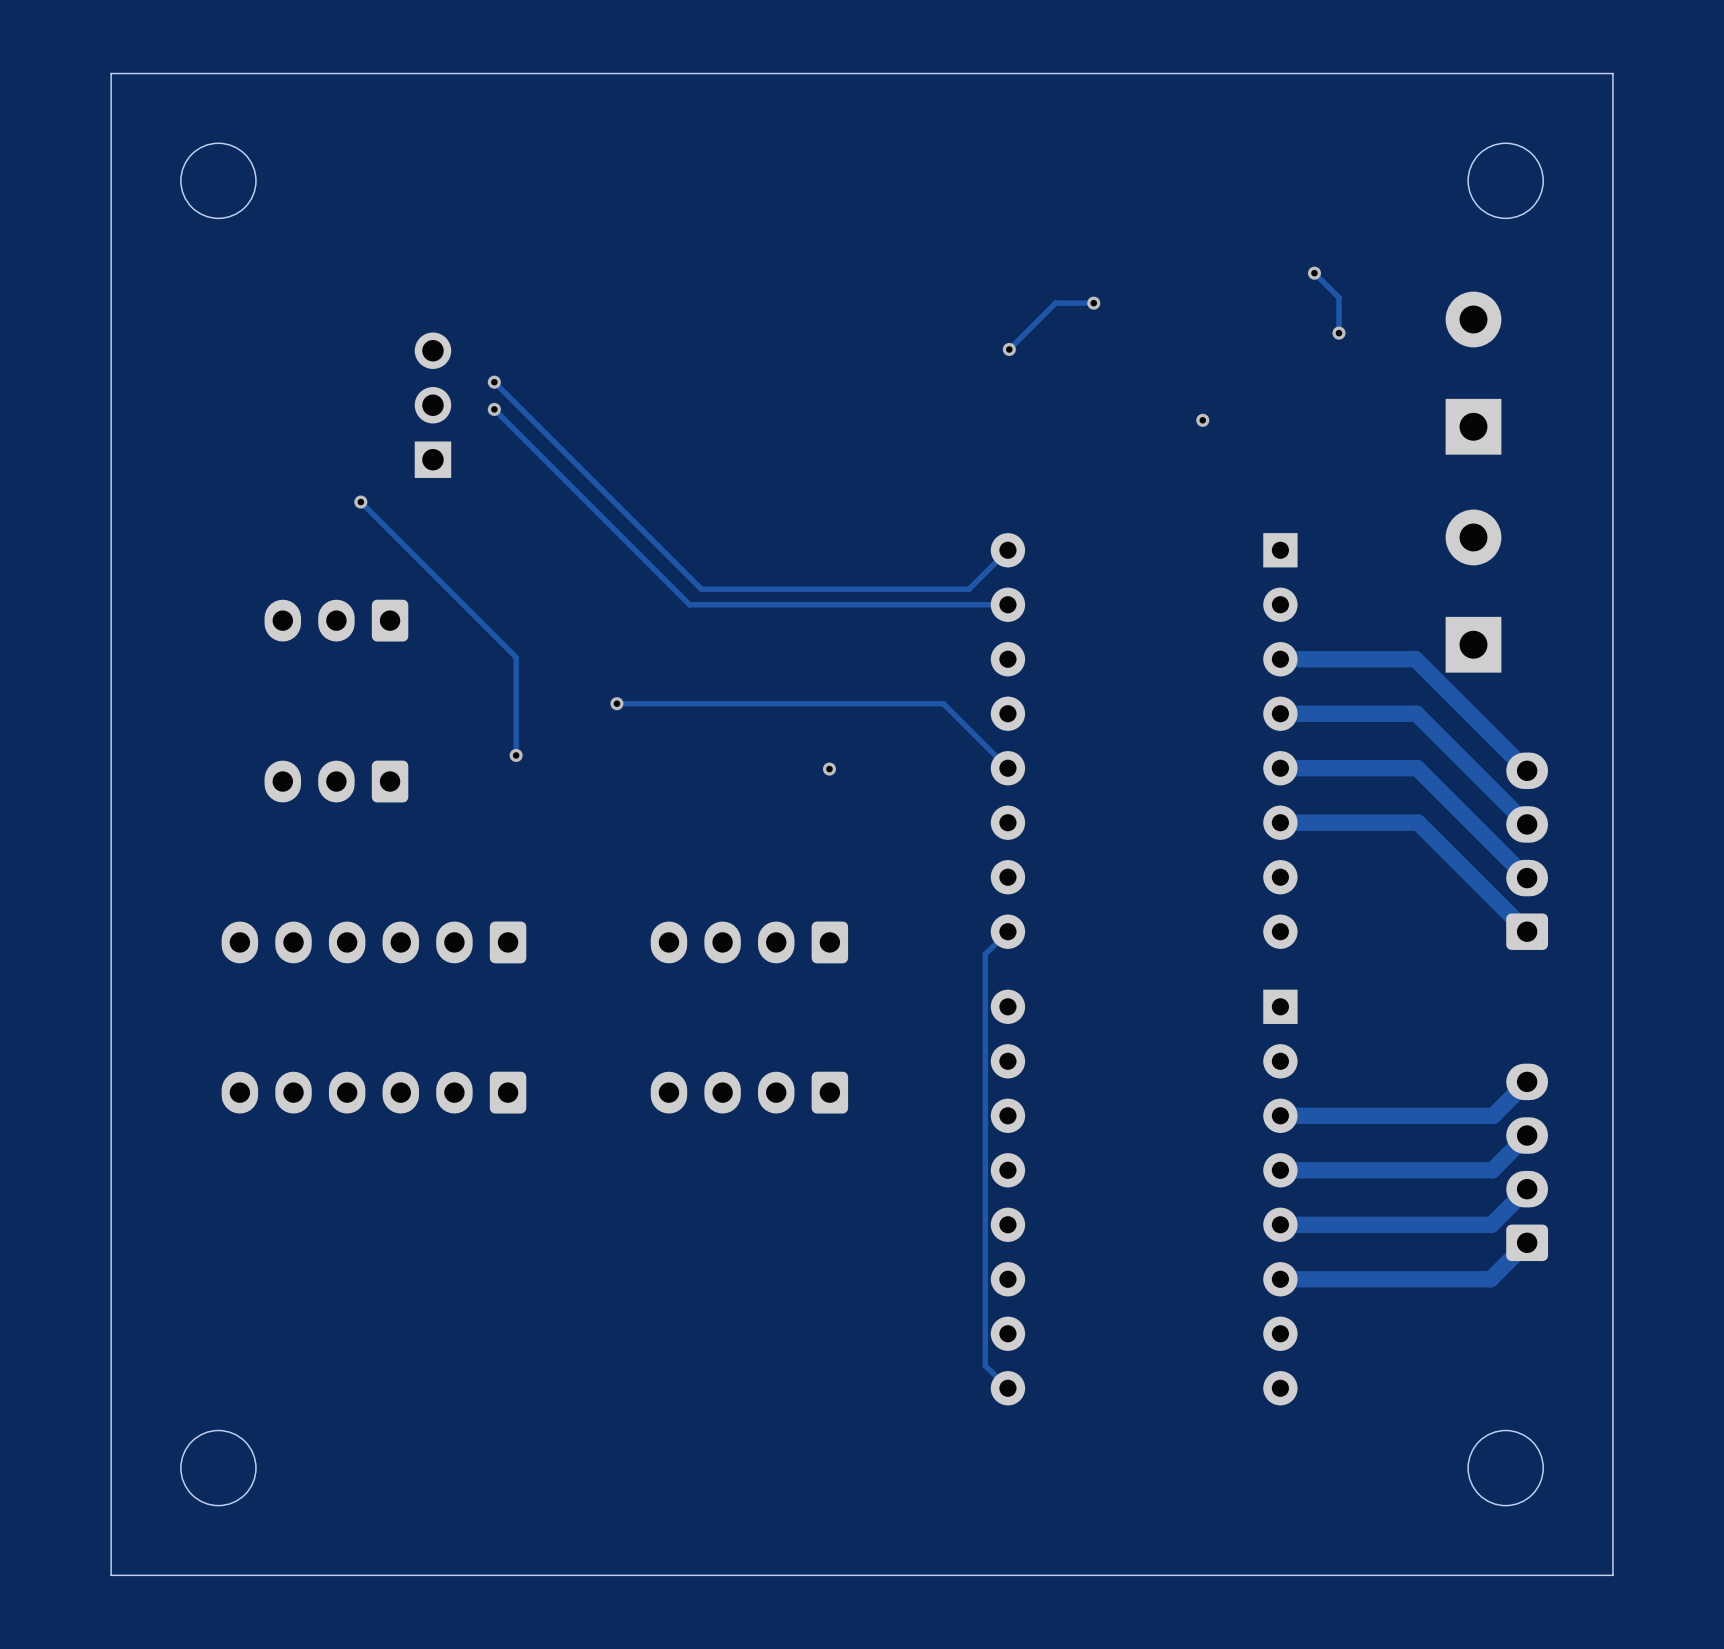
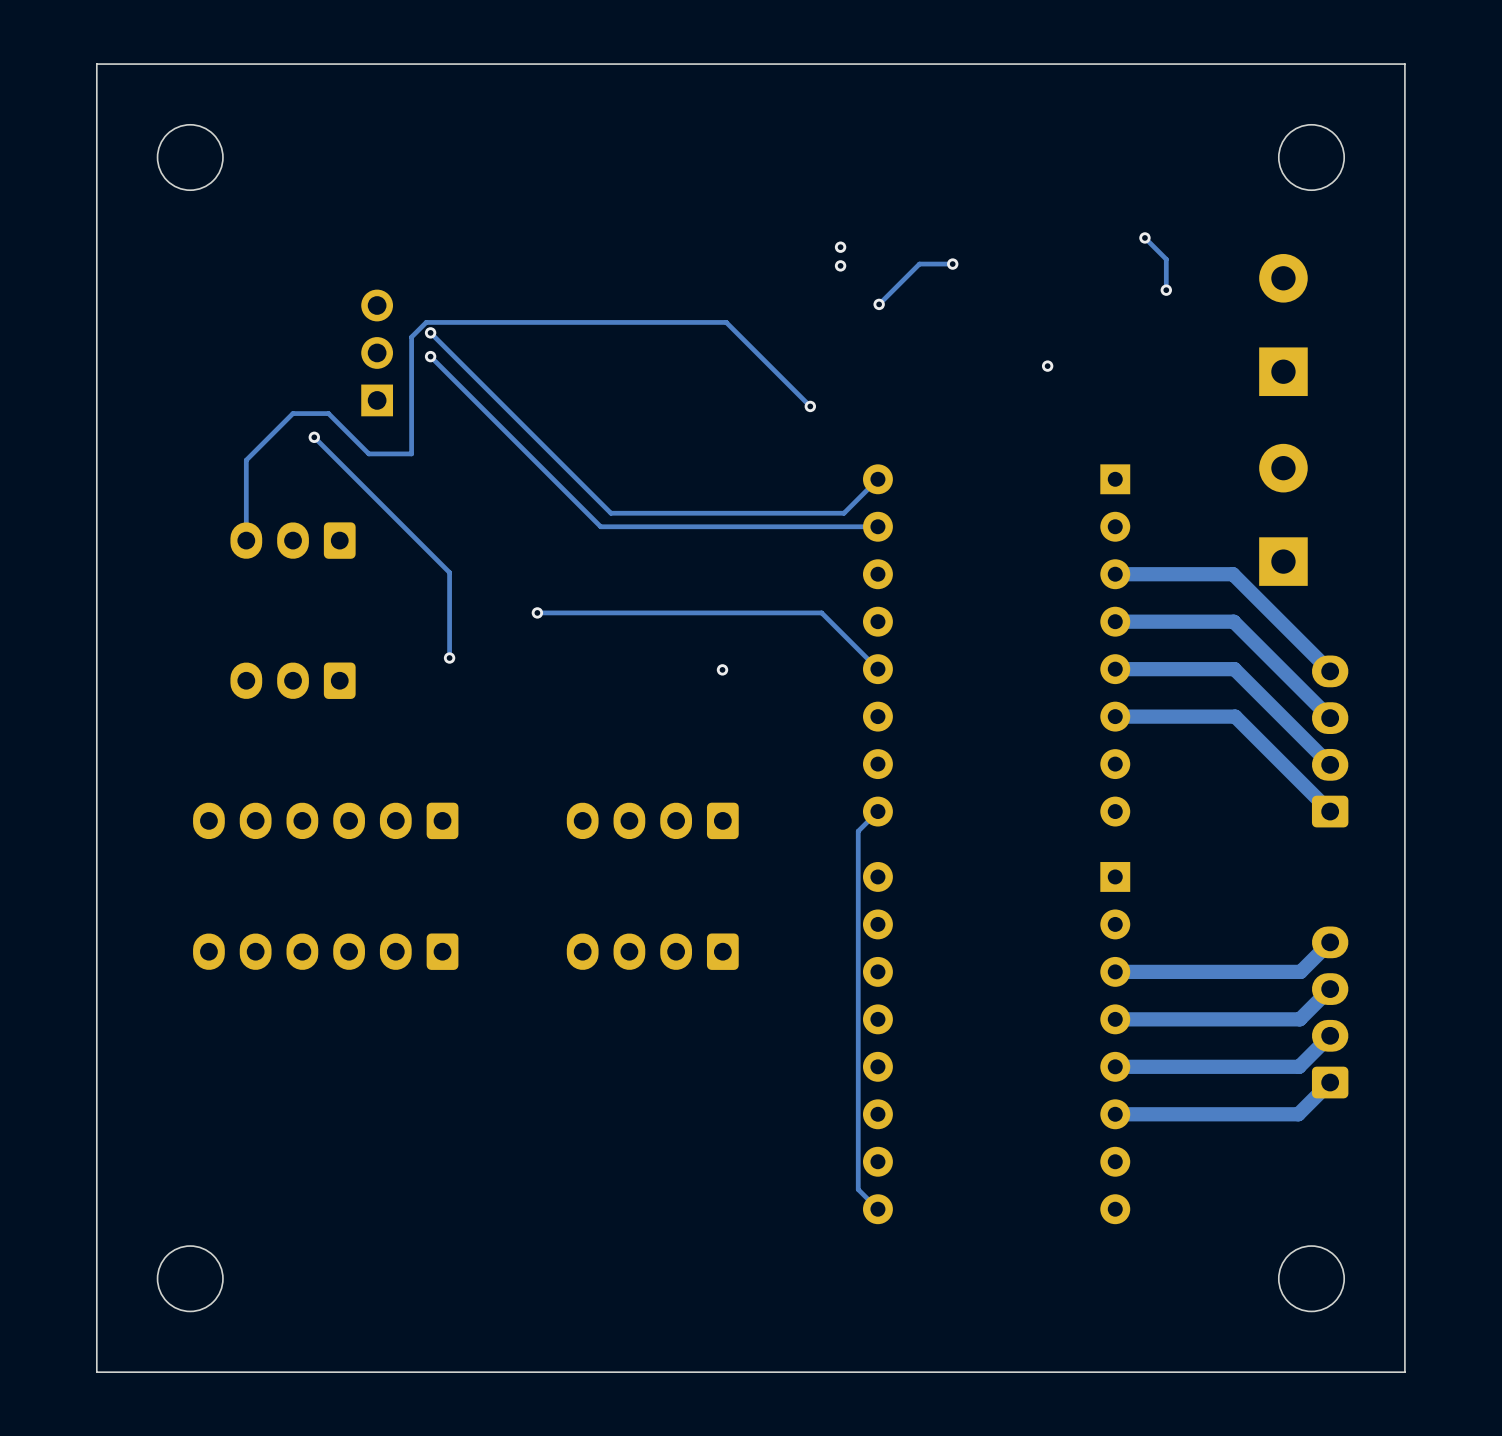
via: none -> (840, 247)
via: none -> (840, 265)
track: none -> (810, 406) (726, 322) (426, 322) (411, 337) (411, 453) (368, 453) (328, 413) (292, 413) (246, 460) (246, 540)
via: none -> (810, 406)

